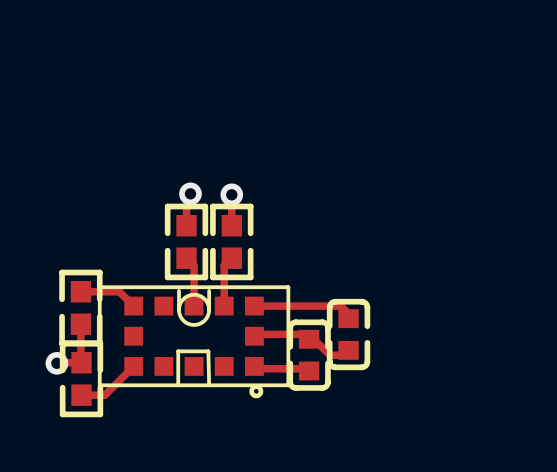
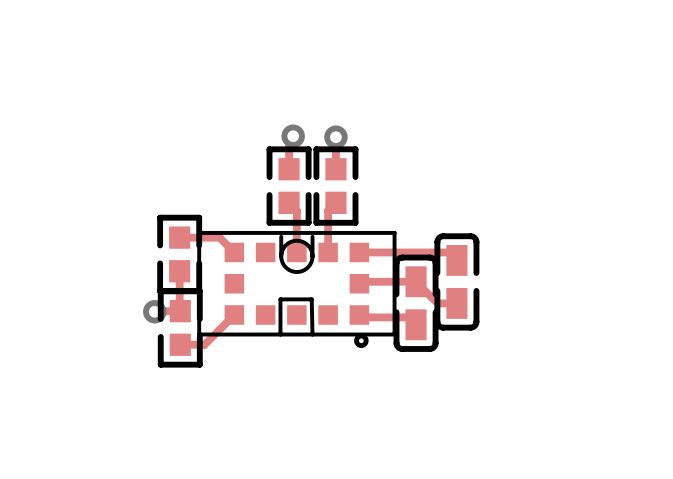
part footprint: [326, 298, 371, 371] -> [434, 233, 480, 331]
part footprint: [287, 319, 331, 391] -> [393, 254, 439, 352]

